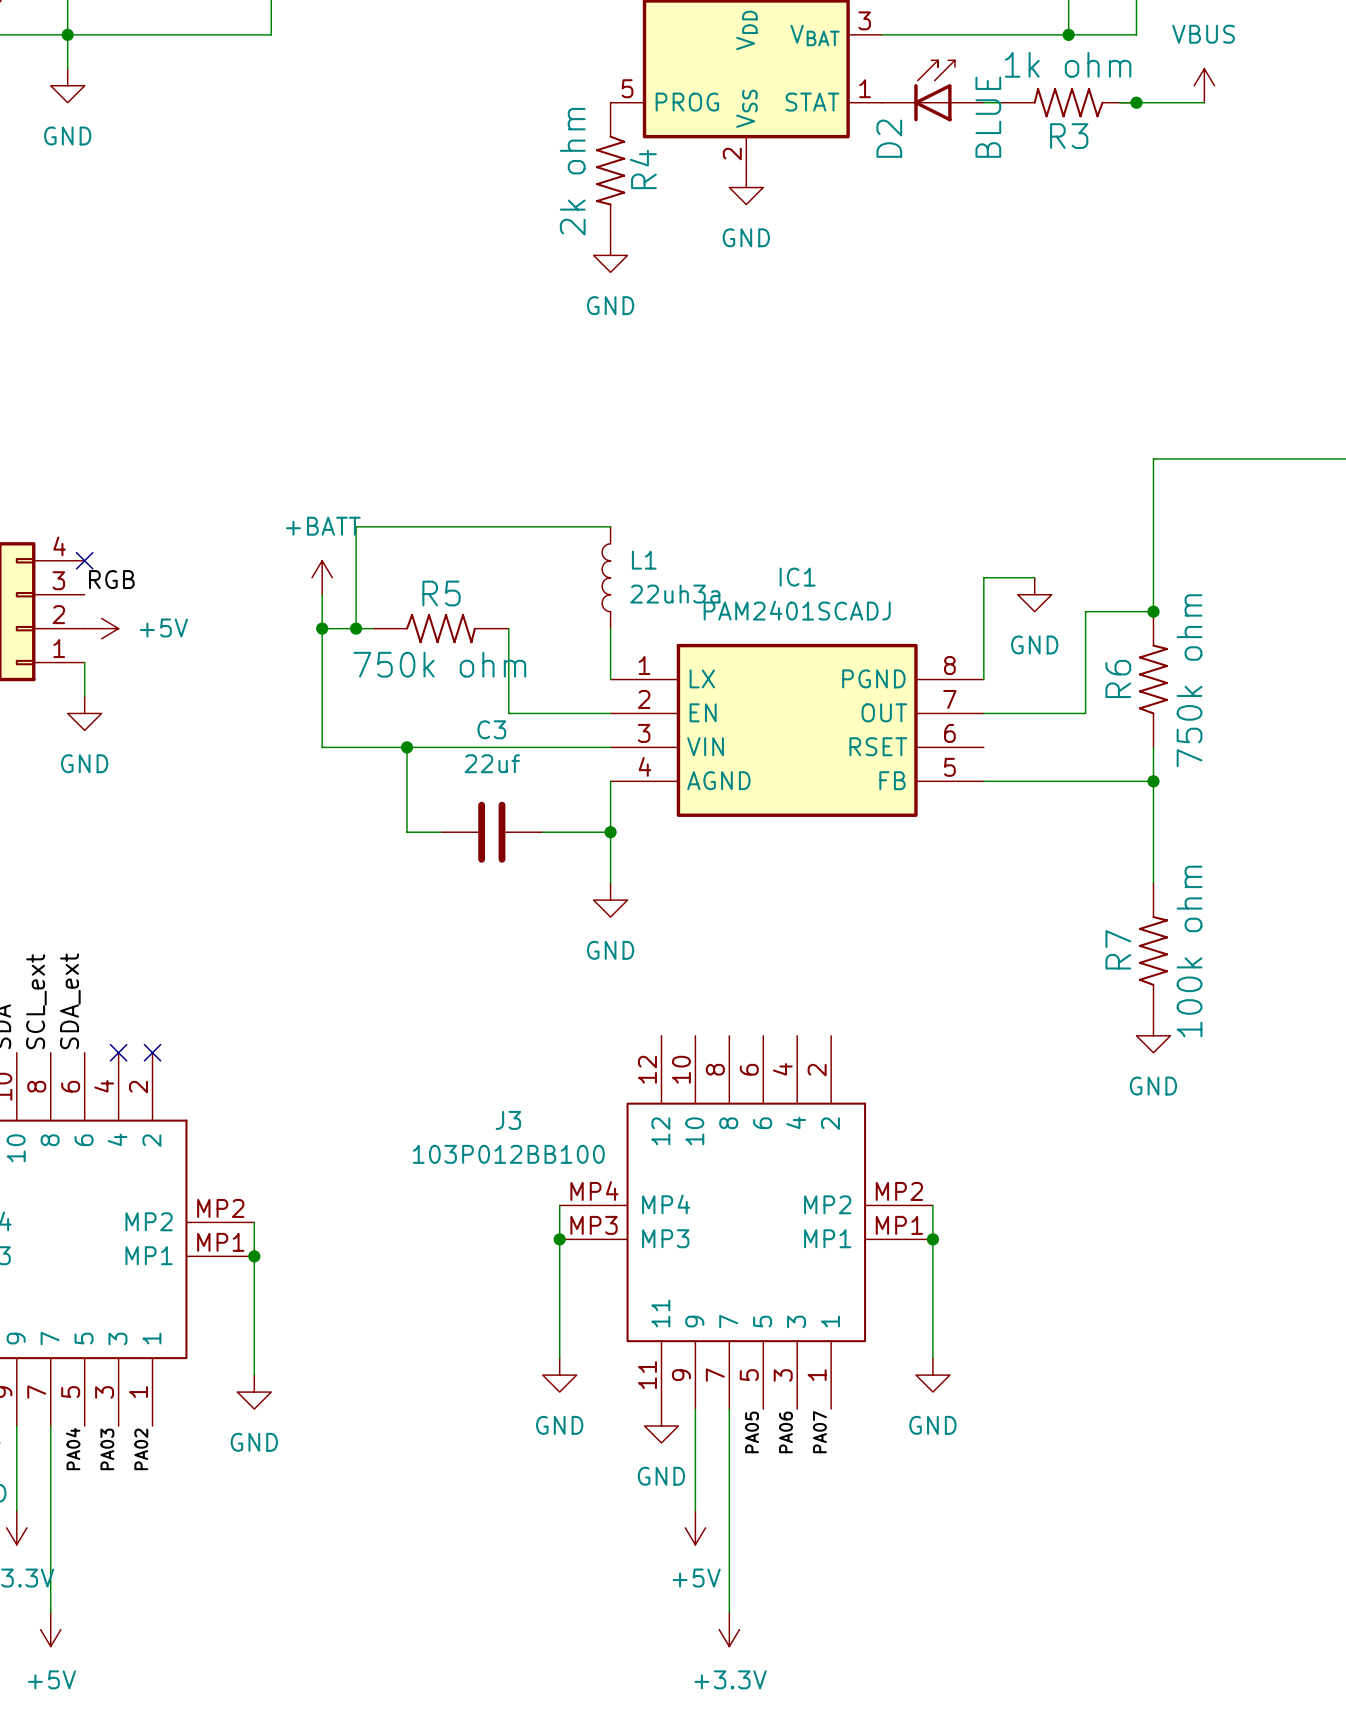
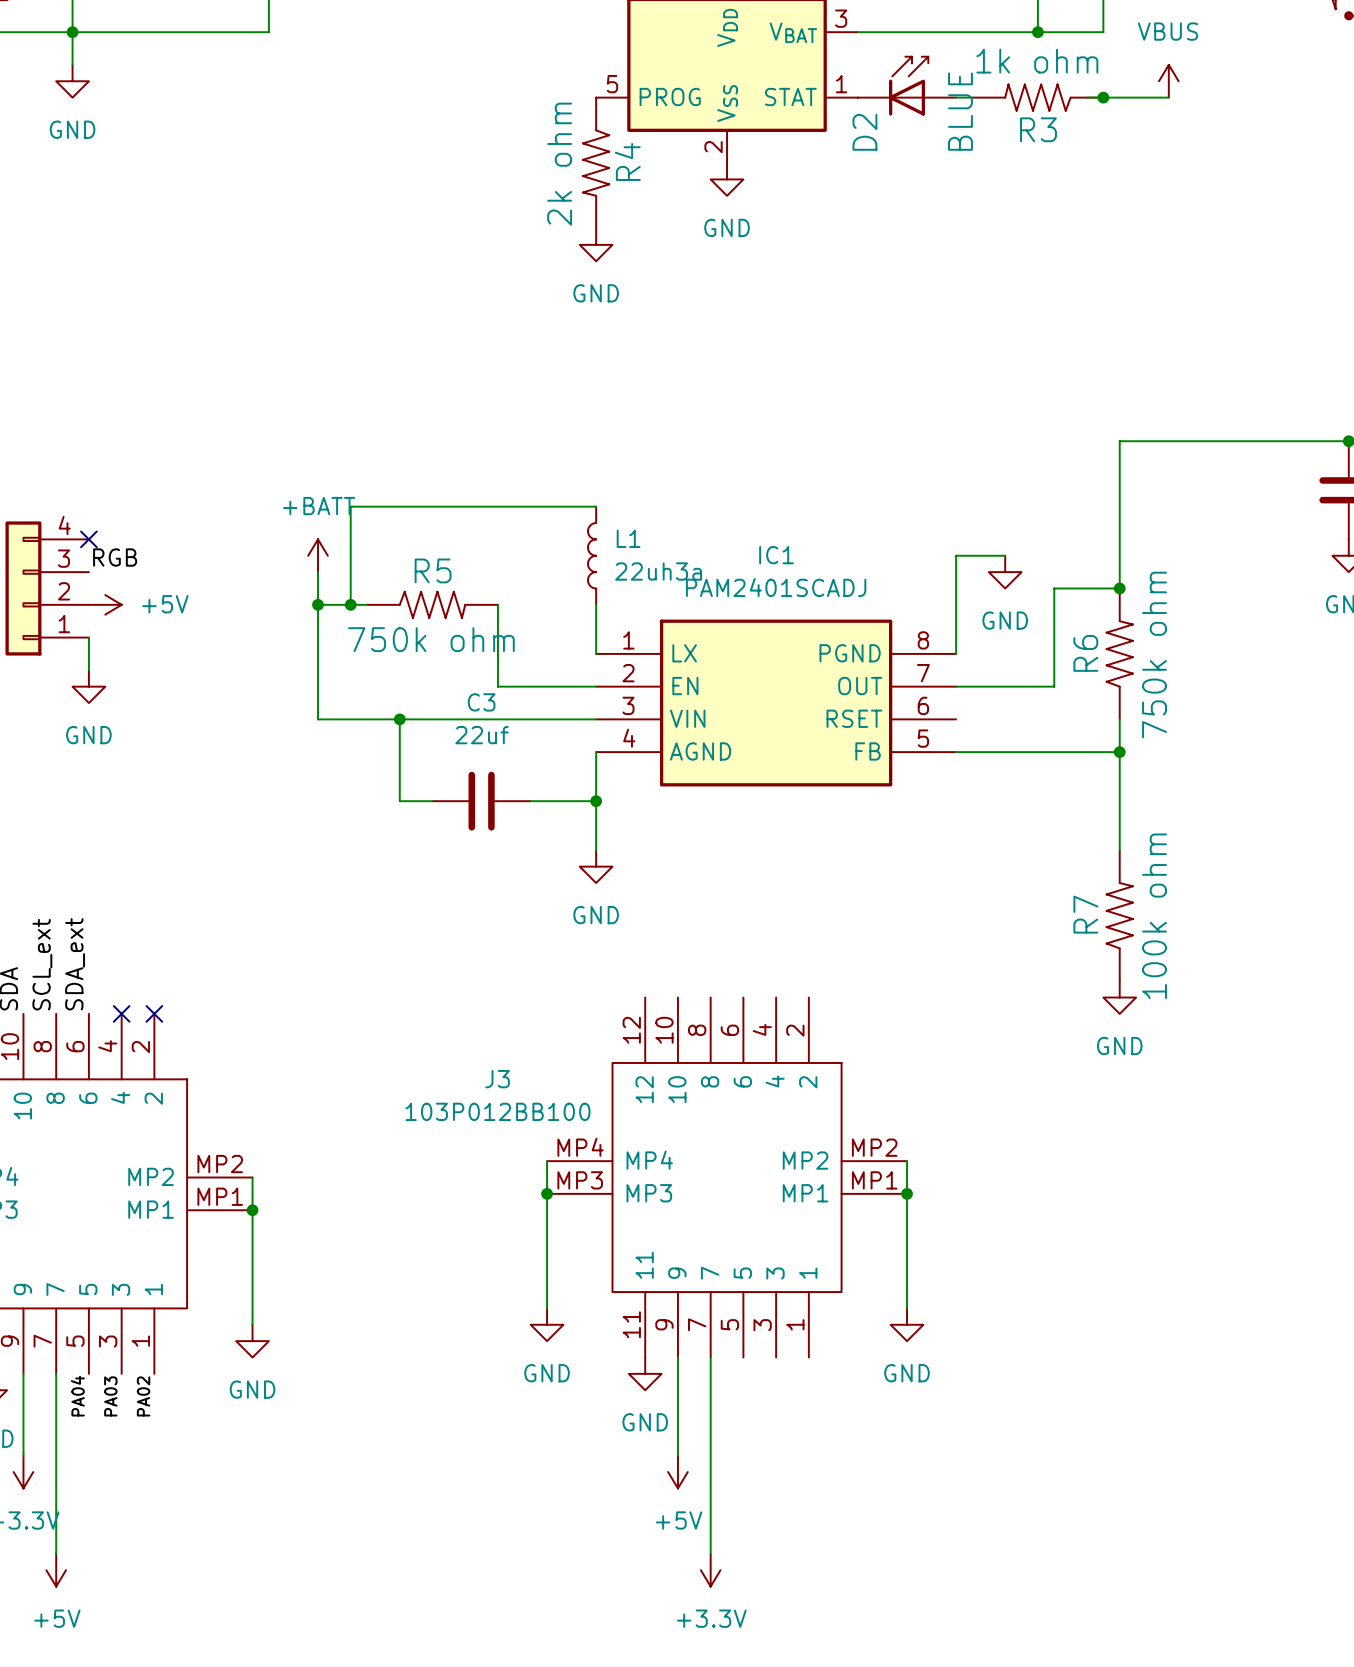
label: PA05 (752, 1432) -> none
label: PA06 (785, 1432) -> none
label: PA07 (819, 1432) -> none

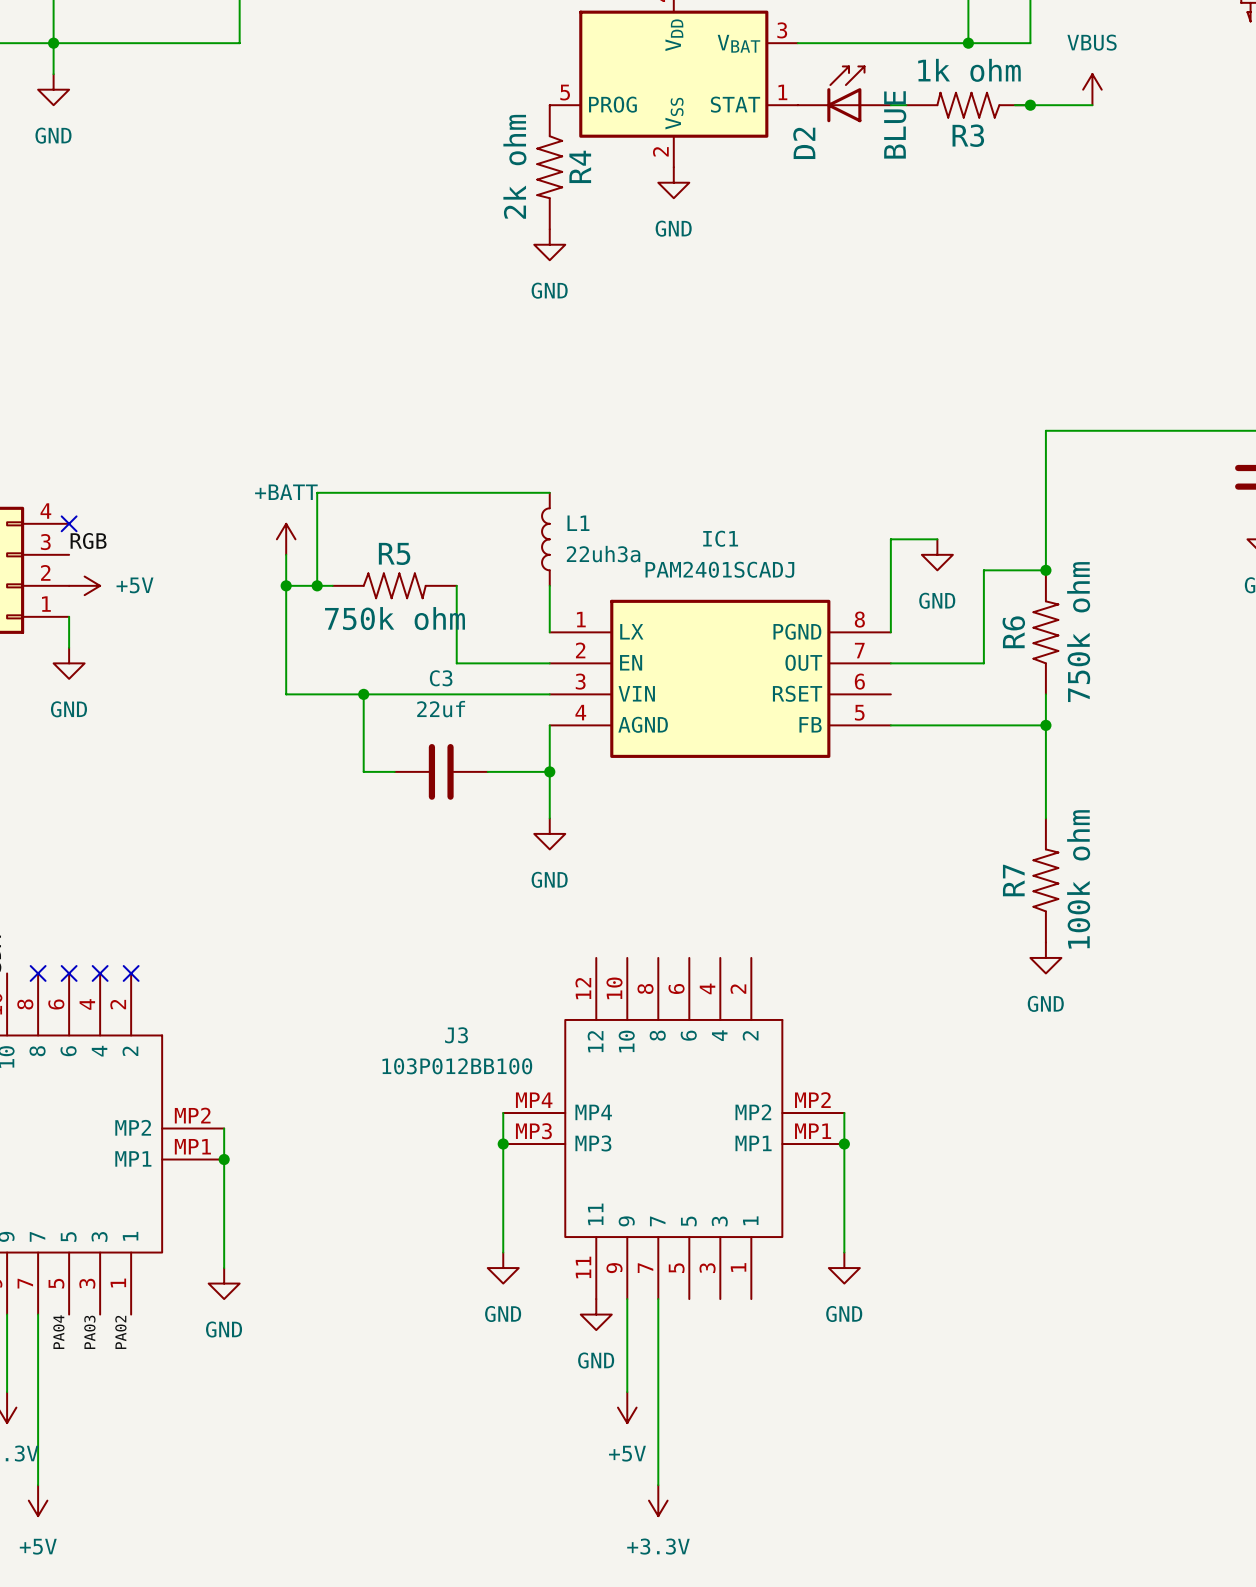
label: SCL_ext (42, 964) -> none
label: SDA_ext (75, 964) -> none
no-connect mark: none -> (38, 973)
no-connect mark: none -> (69, 973)

